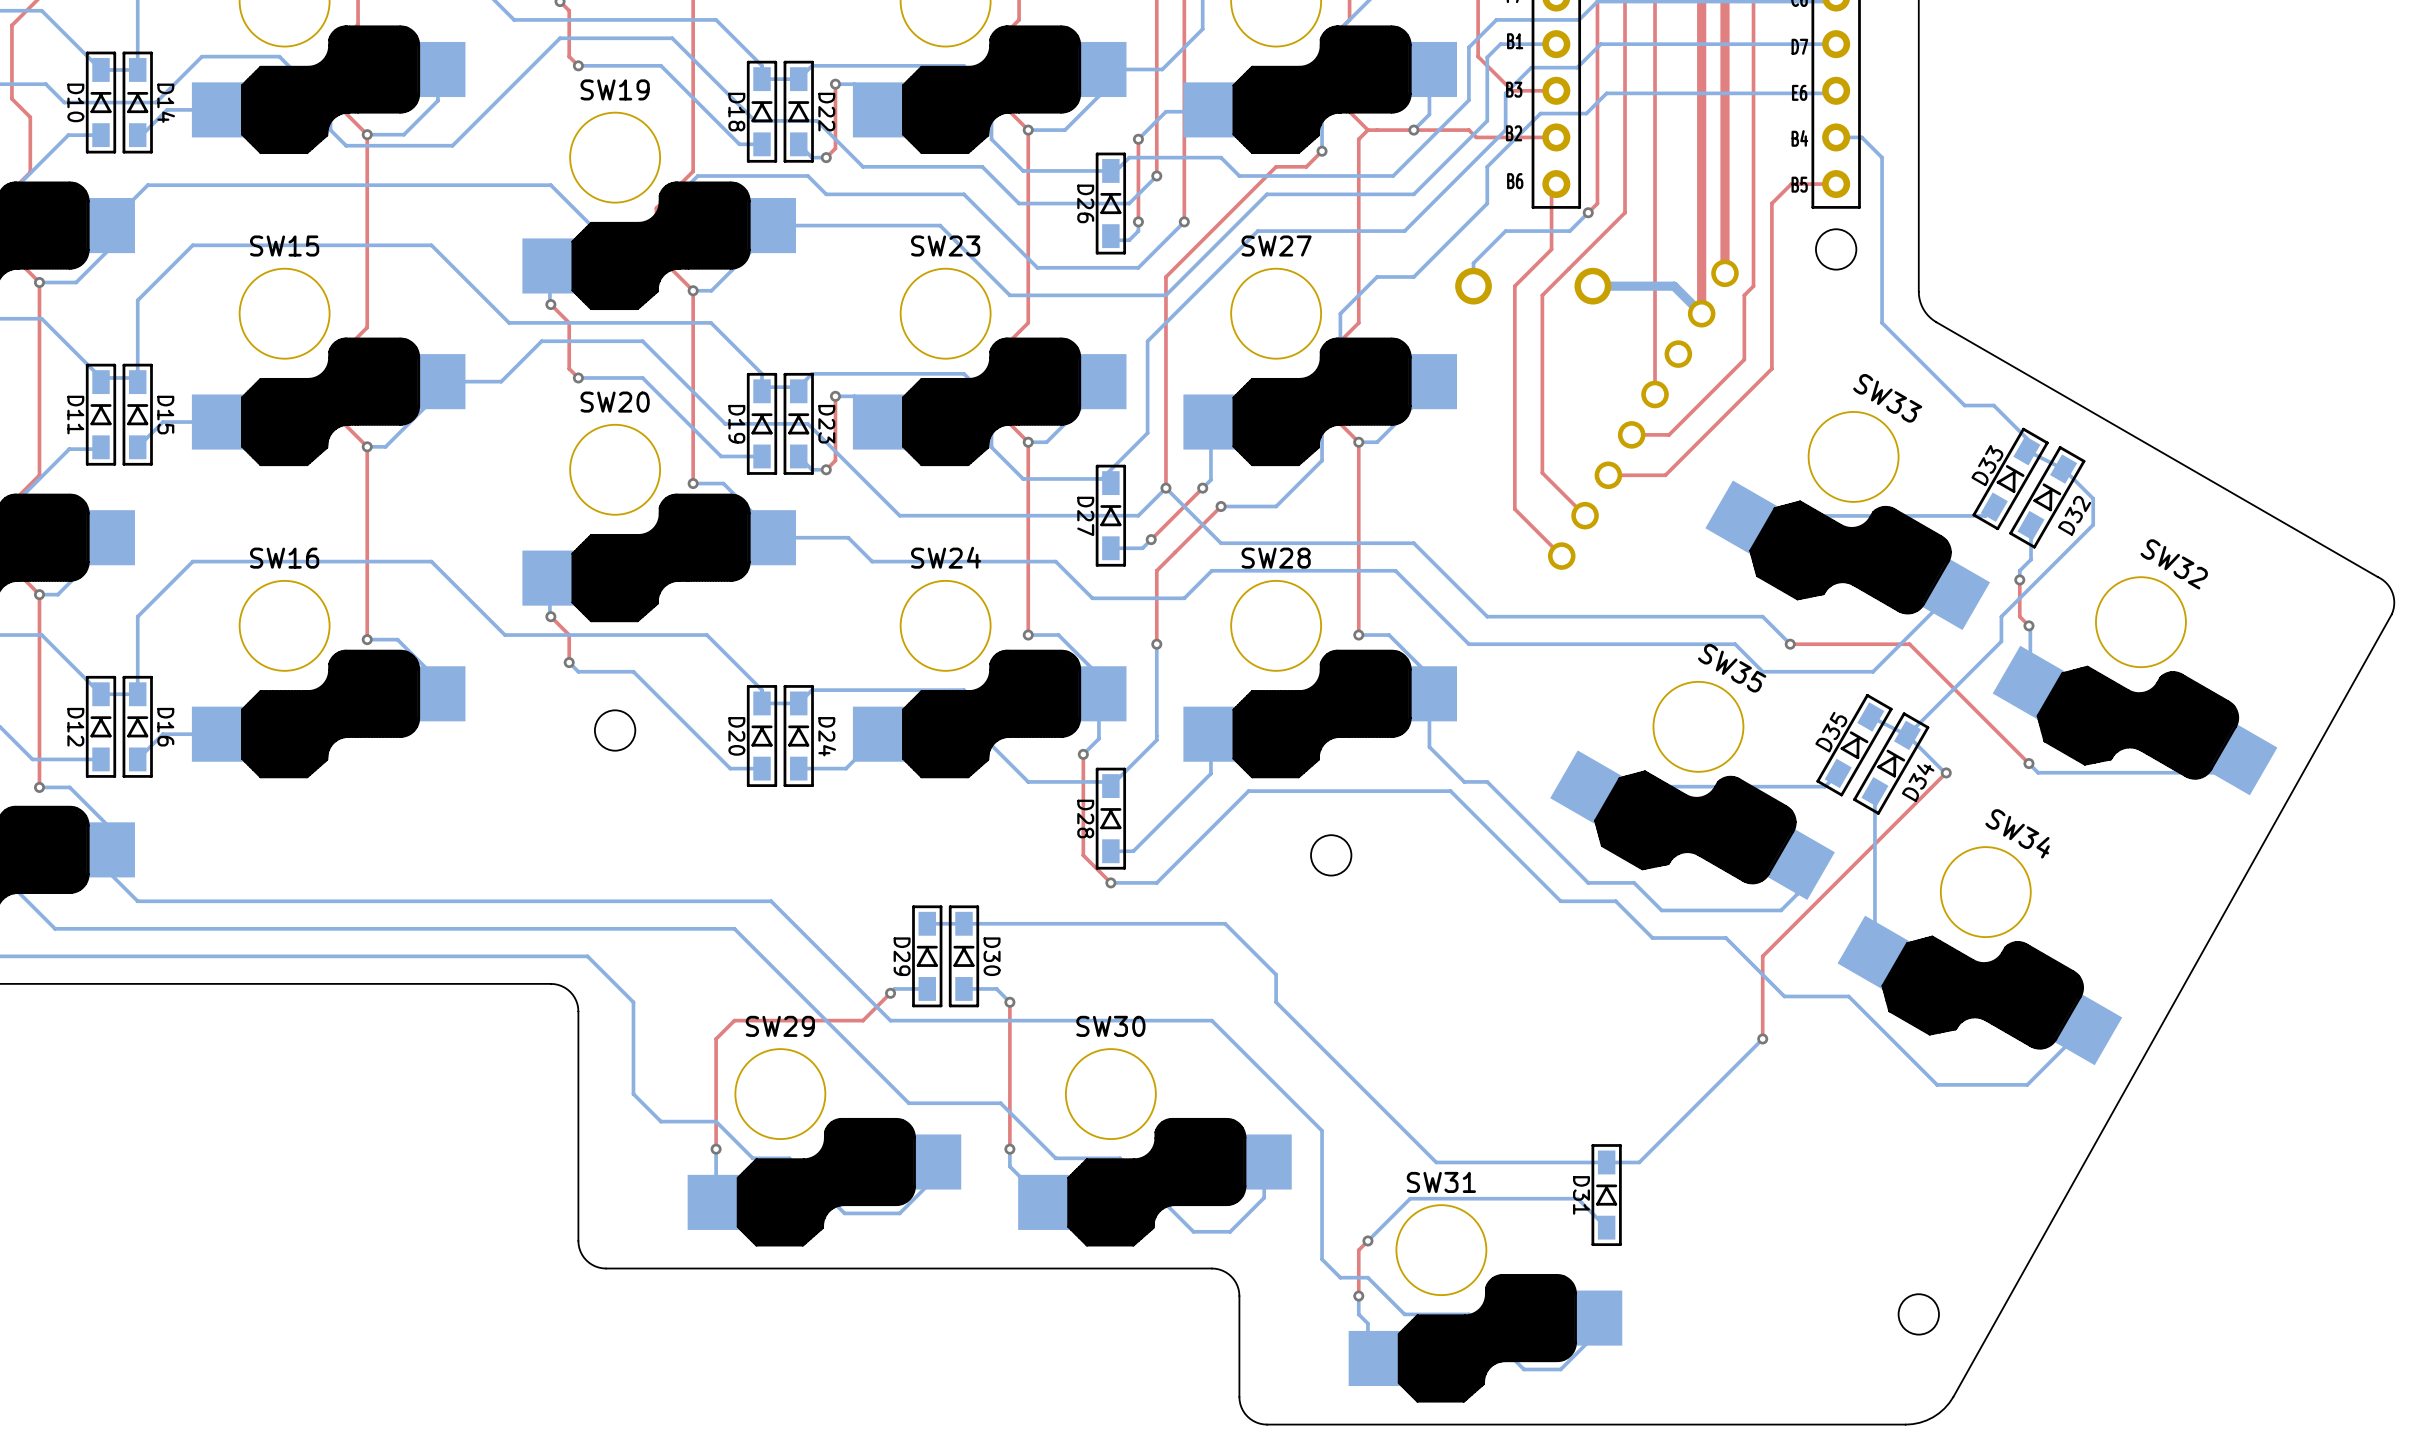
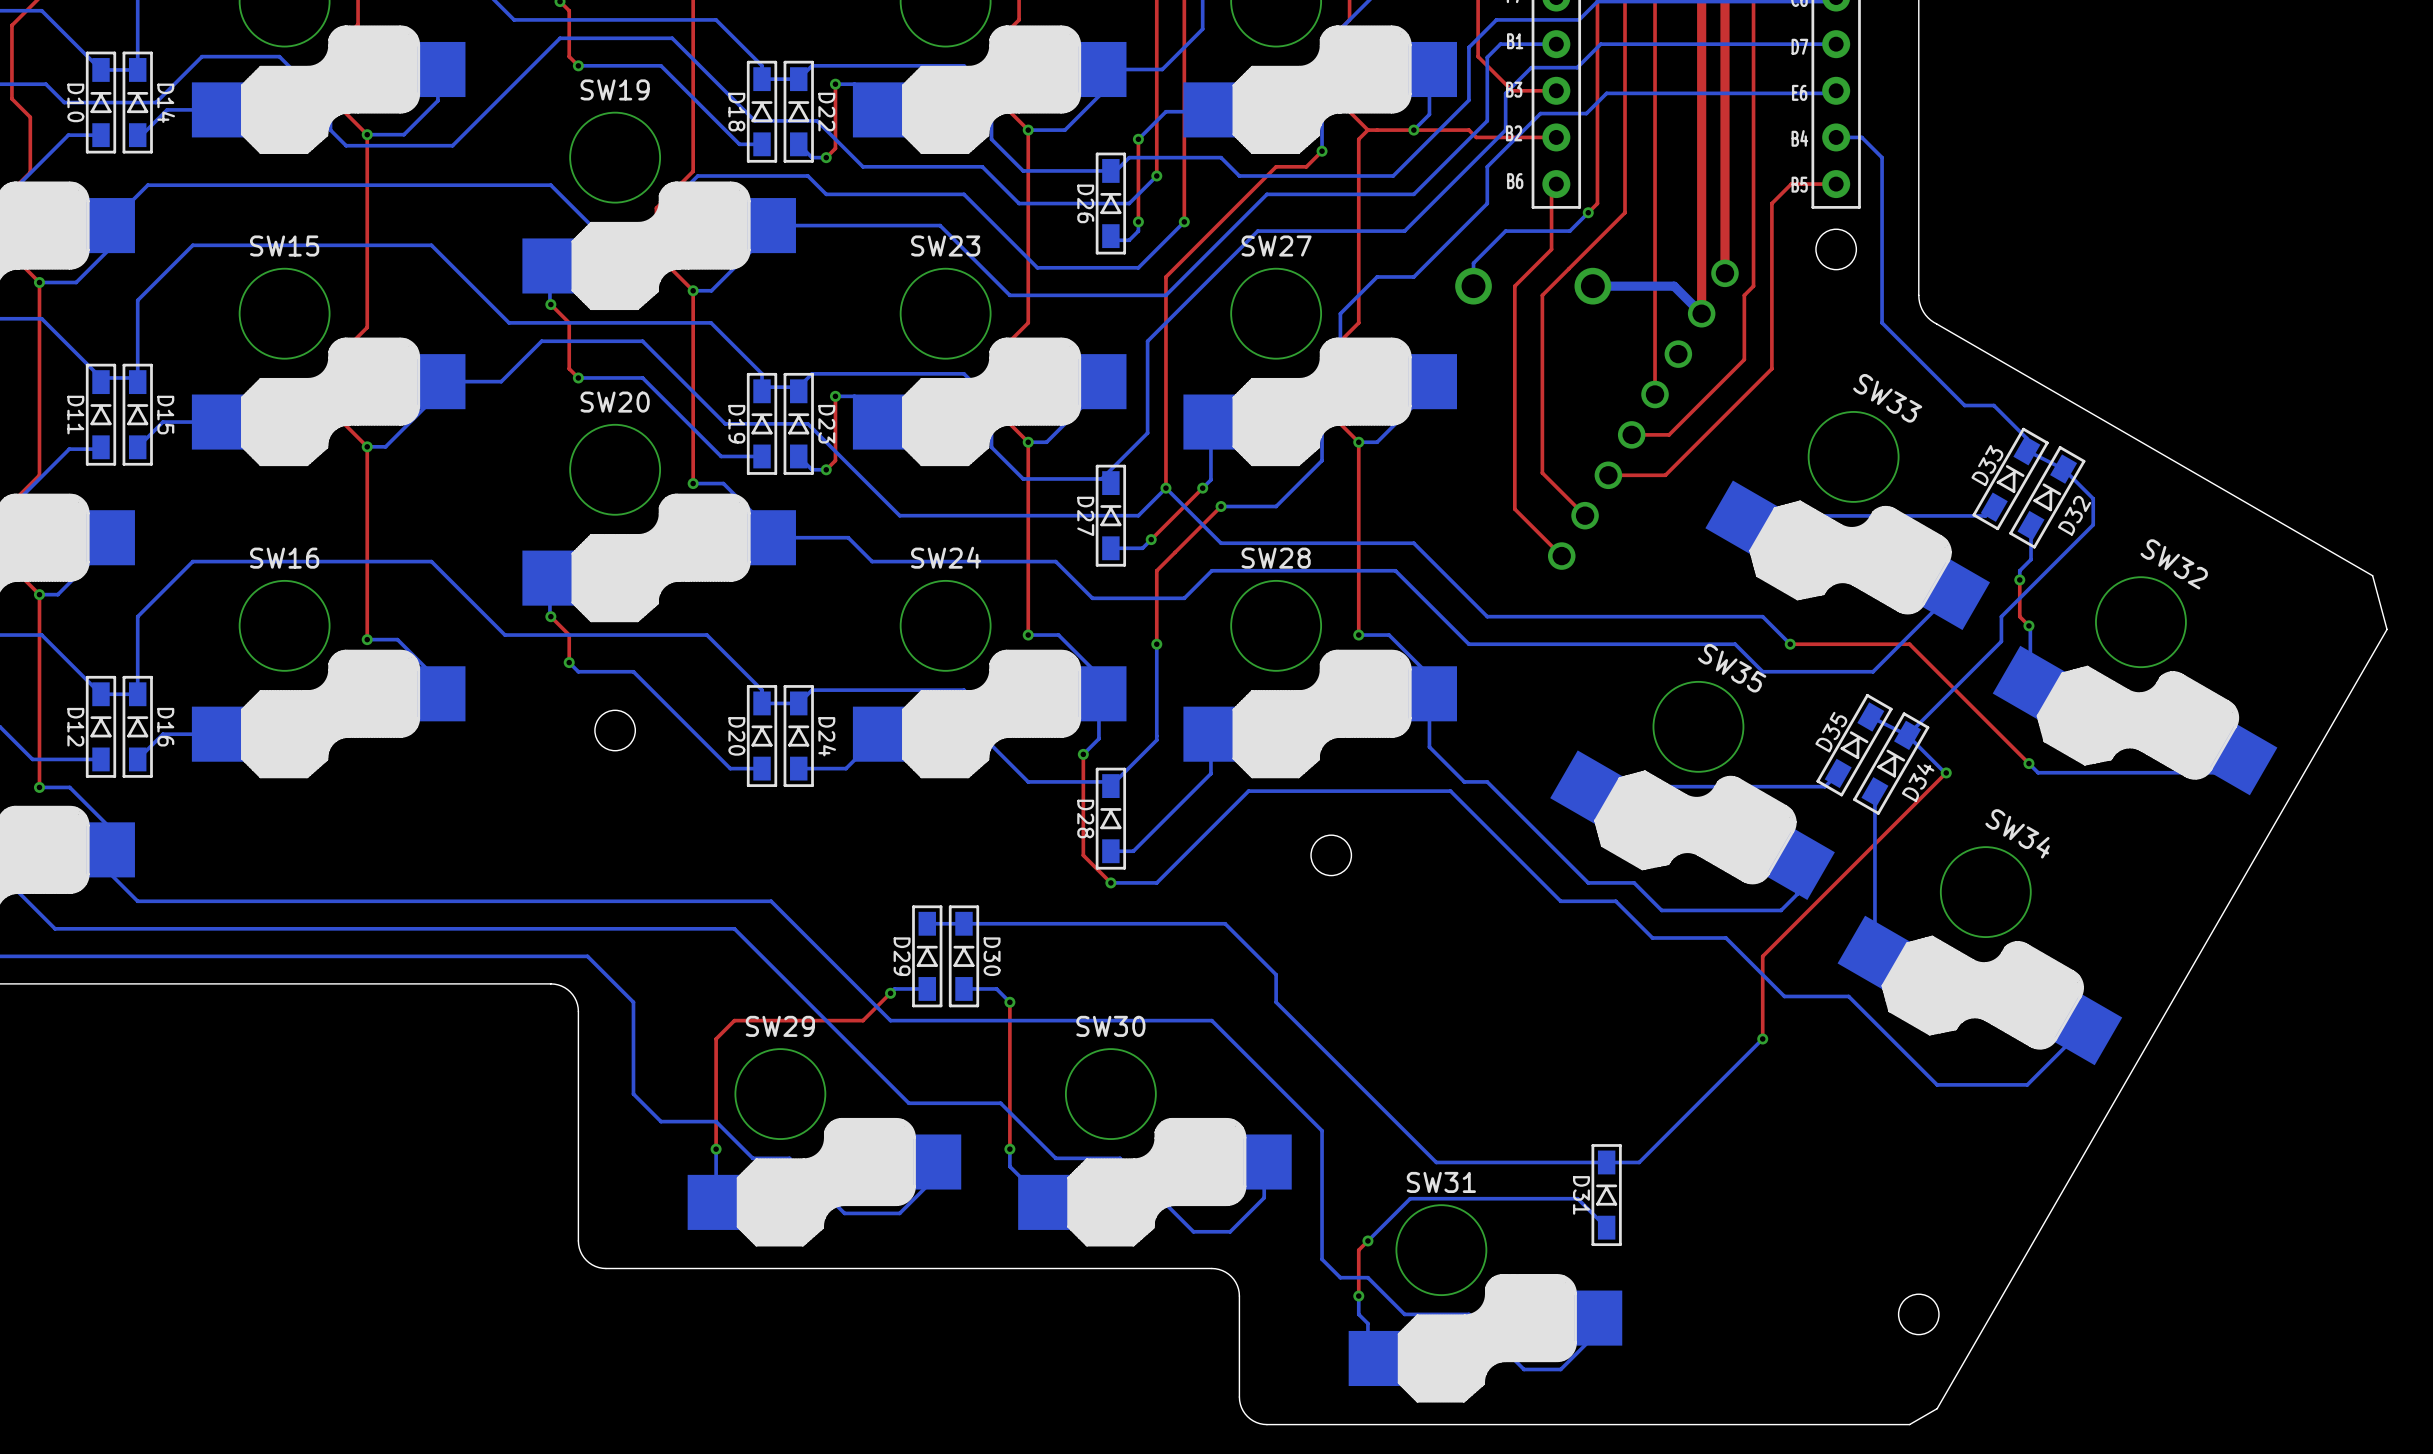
board edge: (1918, 291) (1923, 309) (1933, 320) (2380, 578) (2389, 587) (2394, 602) (2391, 614) (1953, 1397) (1944, 1408) (1933, 1417) (1919, 1422) (1905, 1424) -> (1918, 291) (1921, 309) (1933, 322) (2372, 575) (2387, 629) (1937, 1408) (1909, 1424) (1905, 1424)

